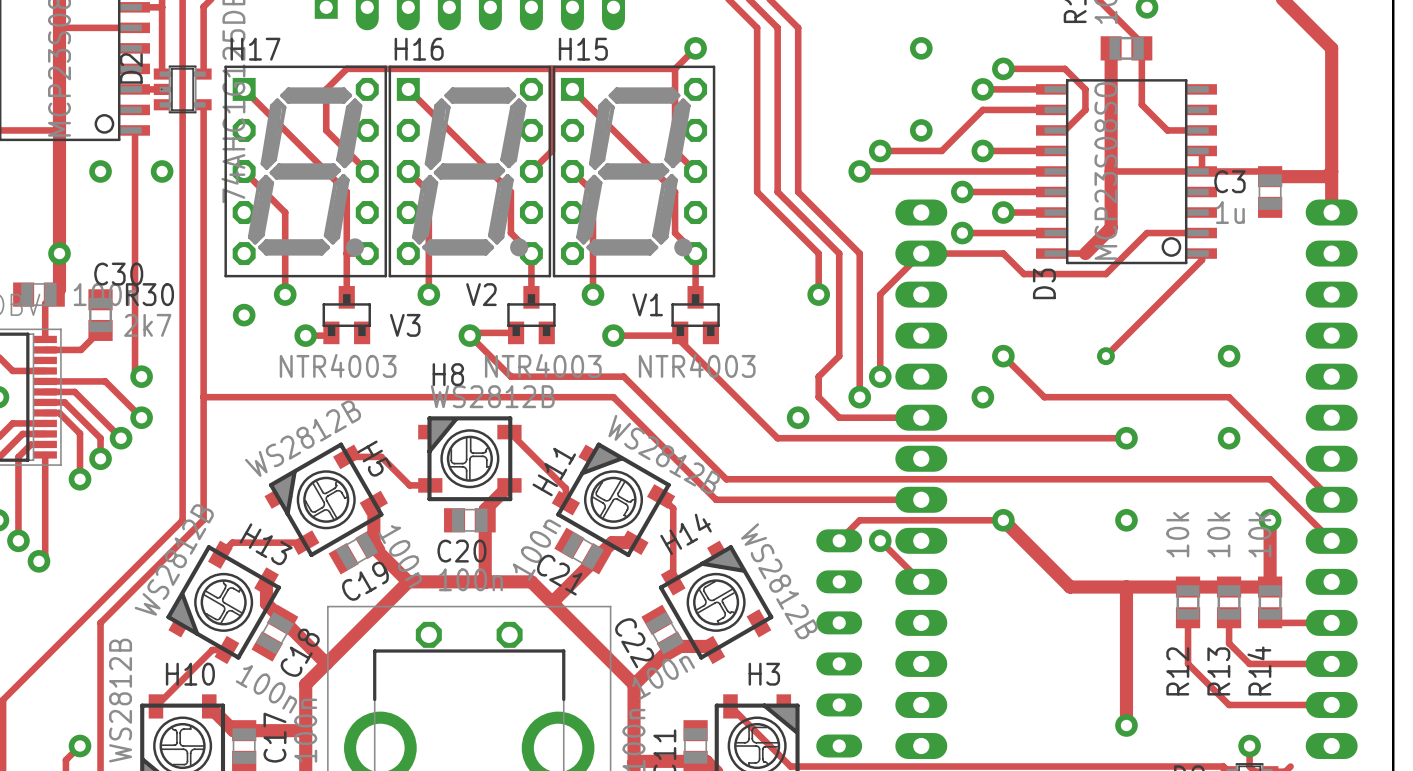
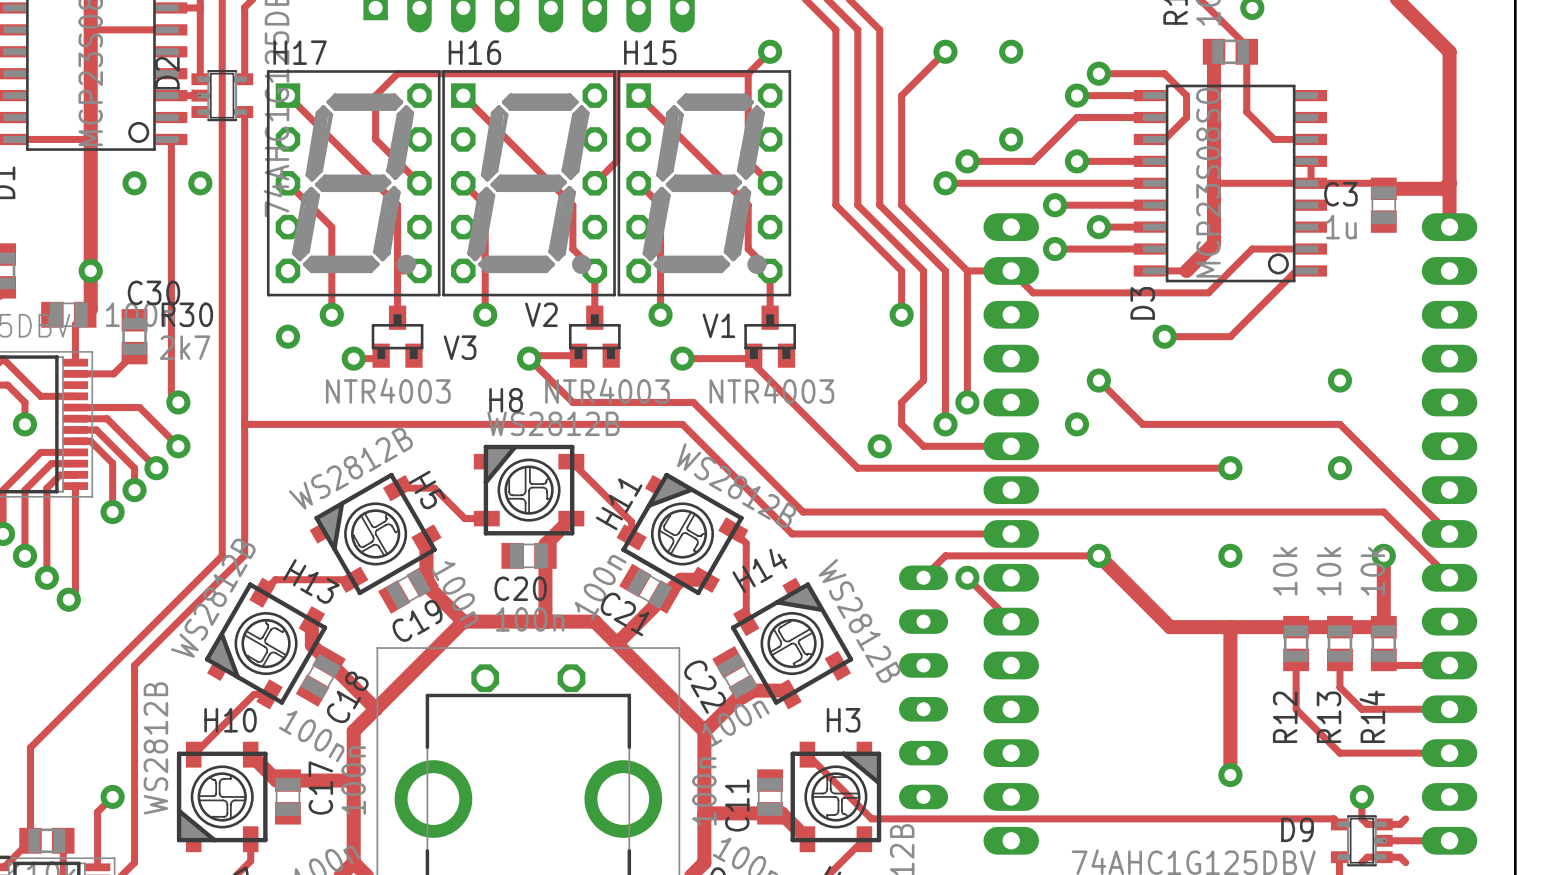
track: none -> (945, 51) (901, 95) (901, 205) (967, 270)
via: none -> (945, 51)
track: none -> (967, 270) (967, 314)
track: (1202, 253) (1202, 260) (1105, 356) -> (1311, 270) (1296, 270) (1230, 336) (1164, 336)
track: (1023, 274) (1003, 253) (921, 253) (880, 294) -> (1120, 292) (1033, 292) (1011, 270) (967, 270)
via: none -> (1164, 336)
via: (1105, 356) -> none

